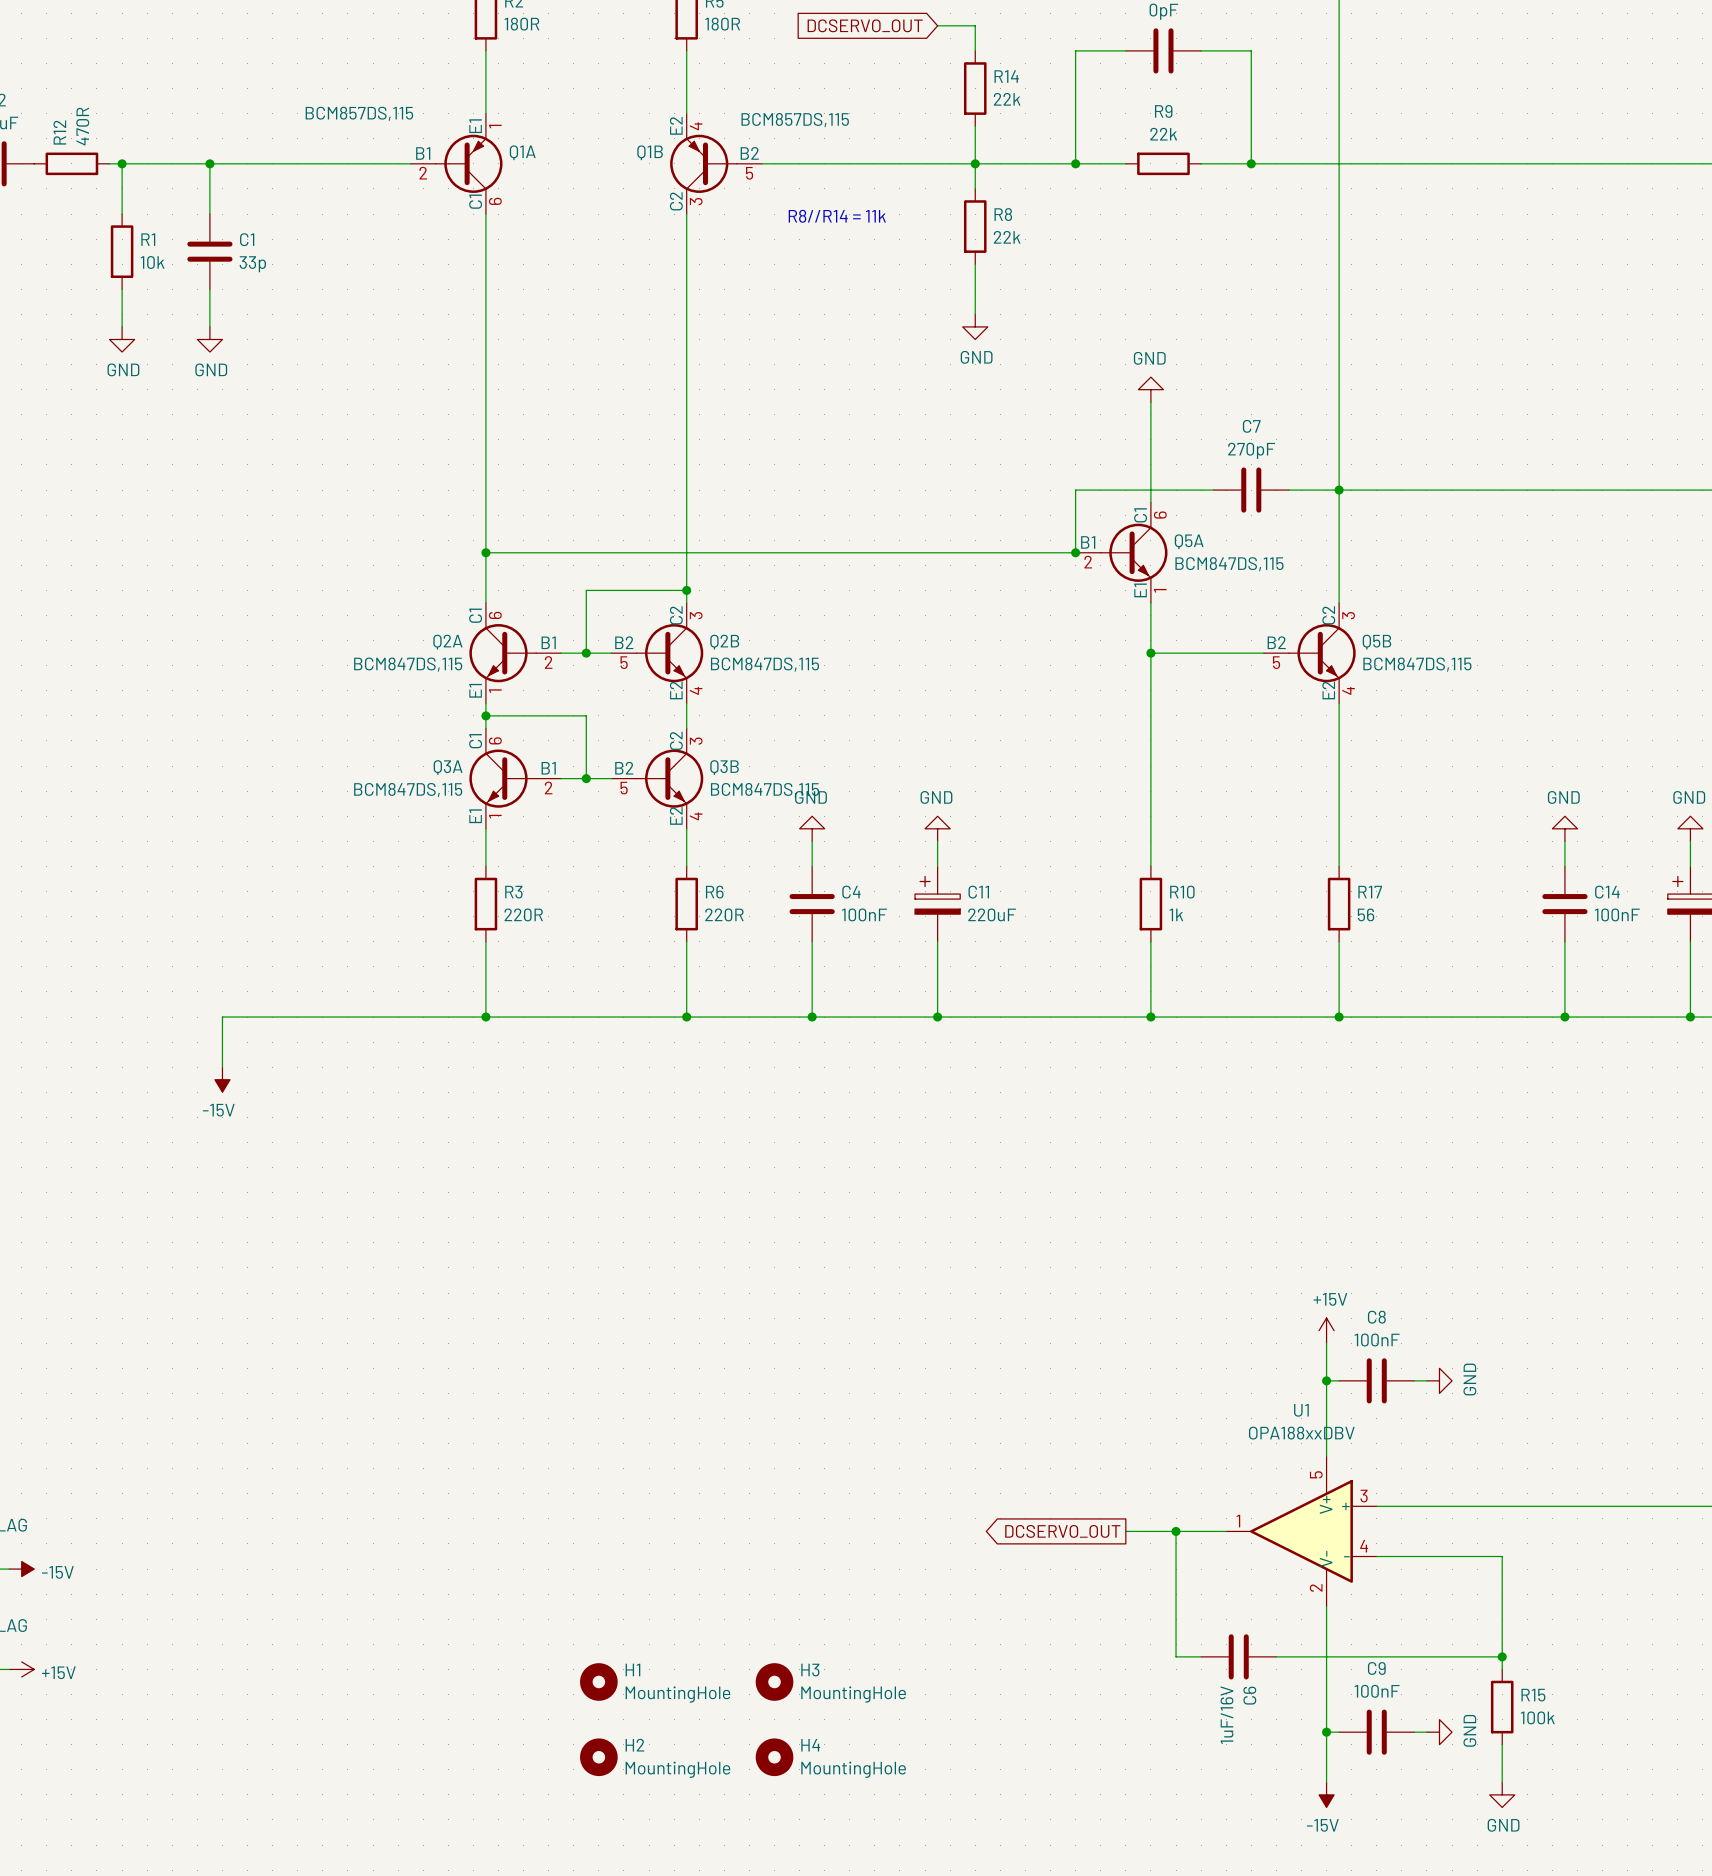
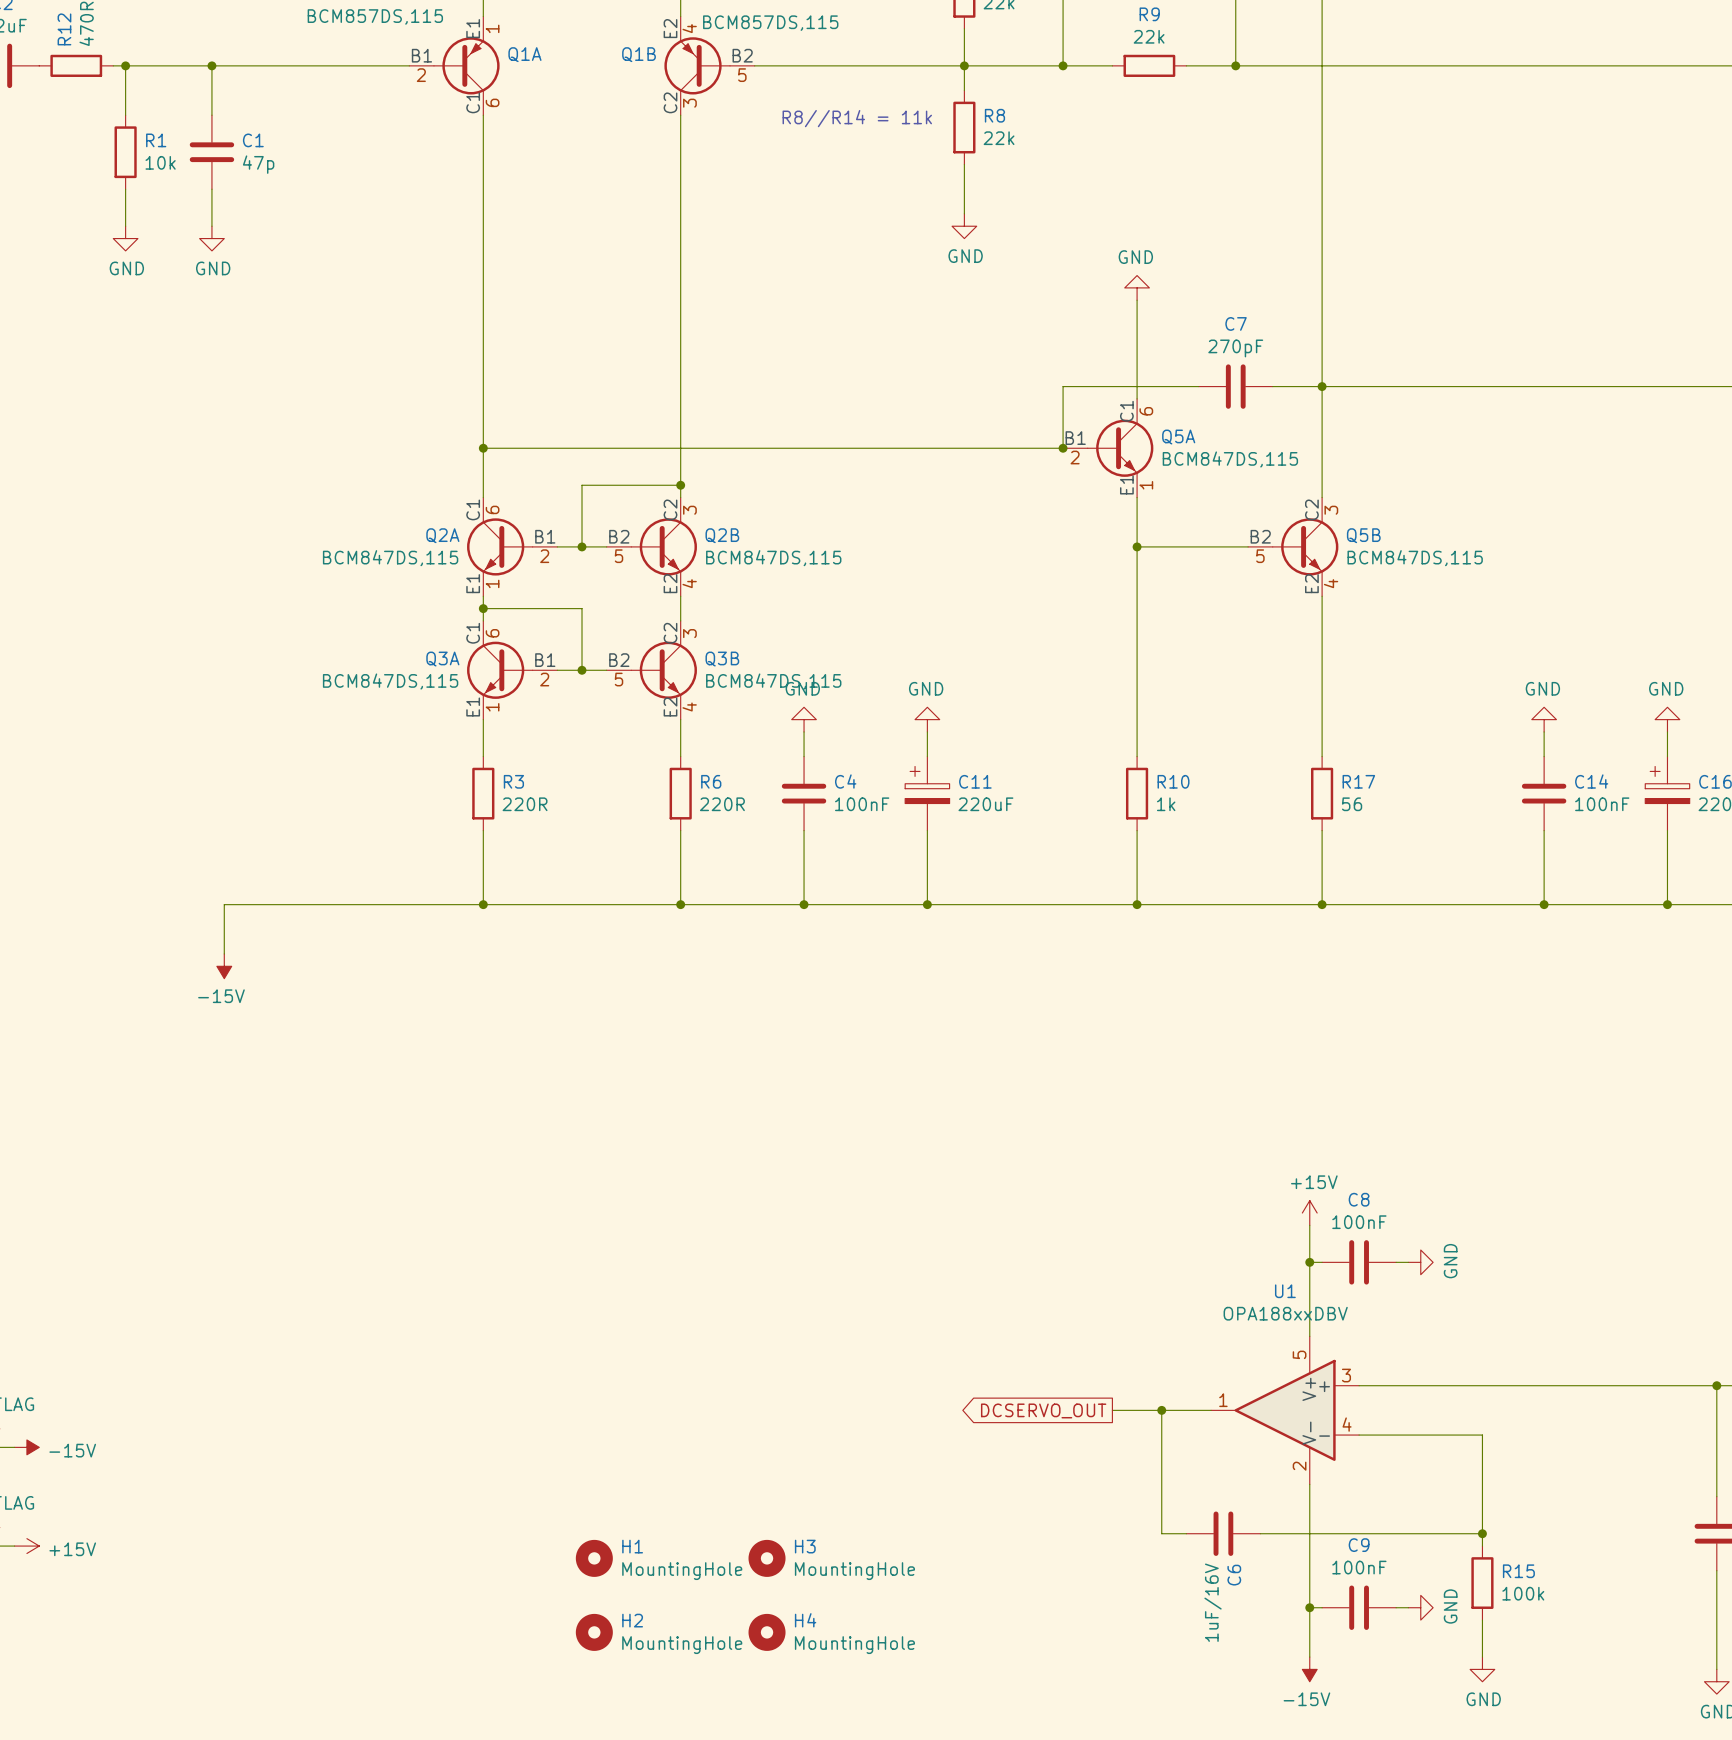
C1 value: 33p (252, 264) -> 47p (258, 164)

